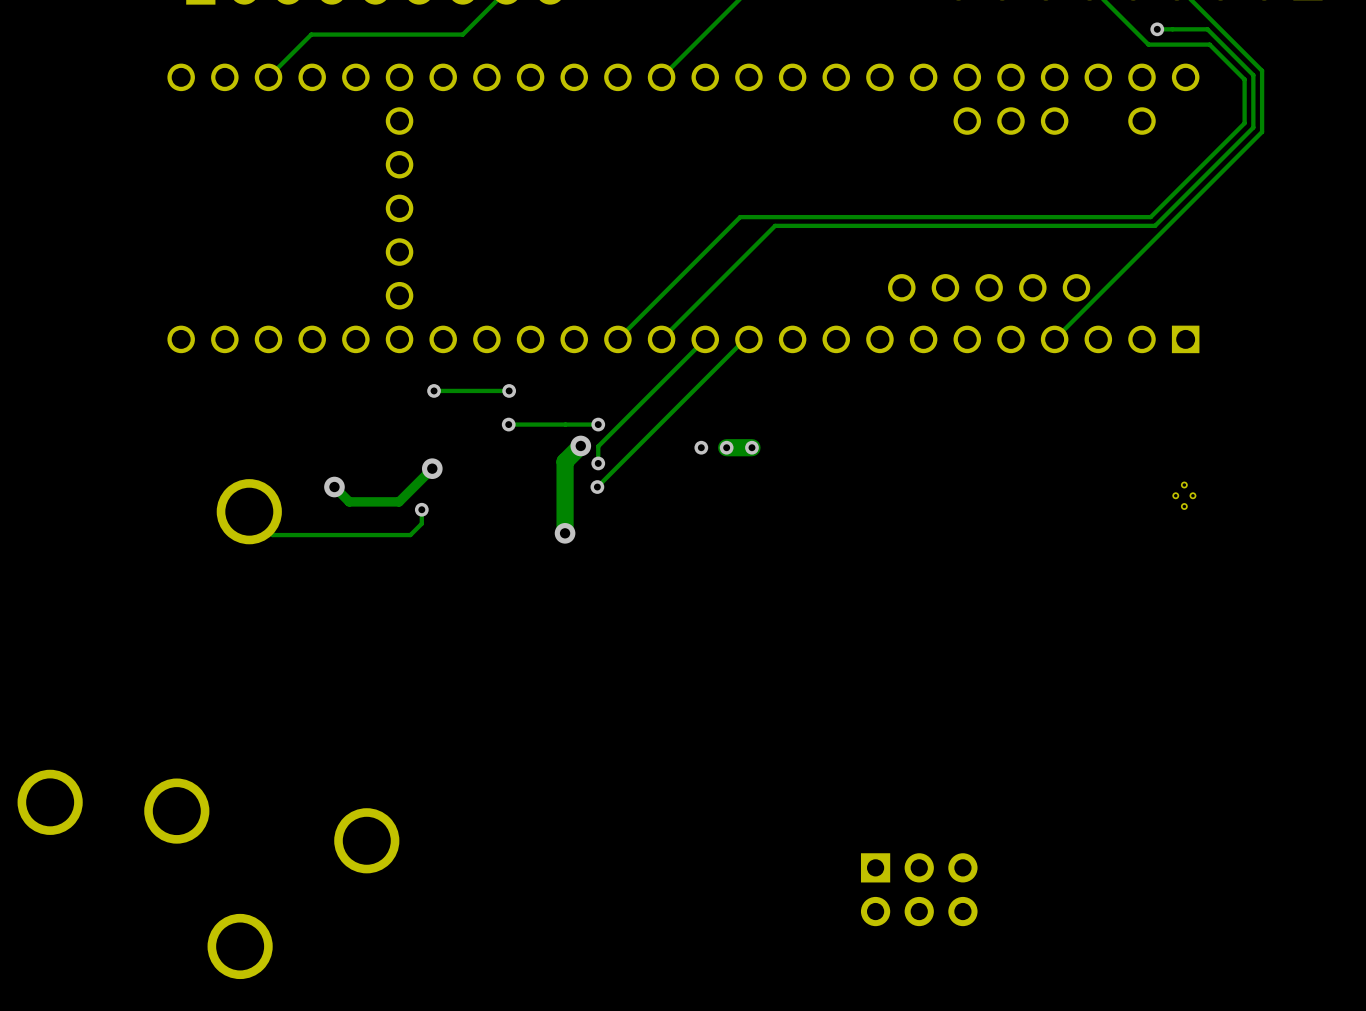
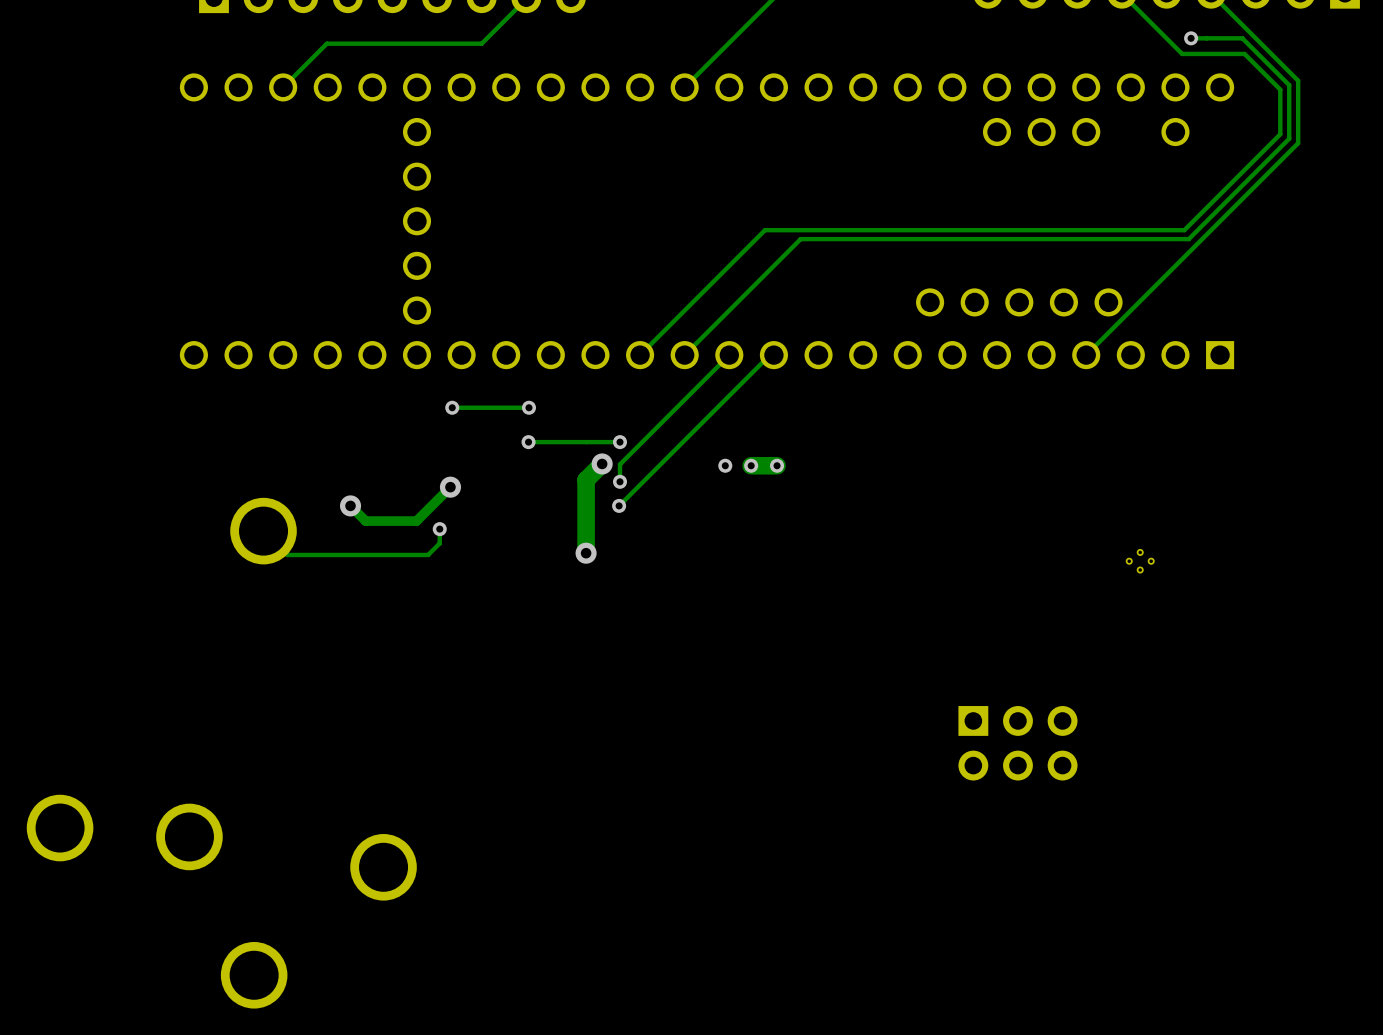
part rotation: 0° (1184, 495) -> 90° clockwise (1140, 561)
part position: (1184, 495) -> (1140, 561)
part position: (919, 889) -> (1017, 743)

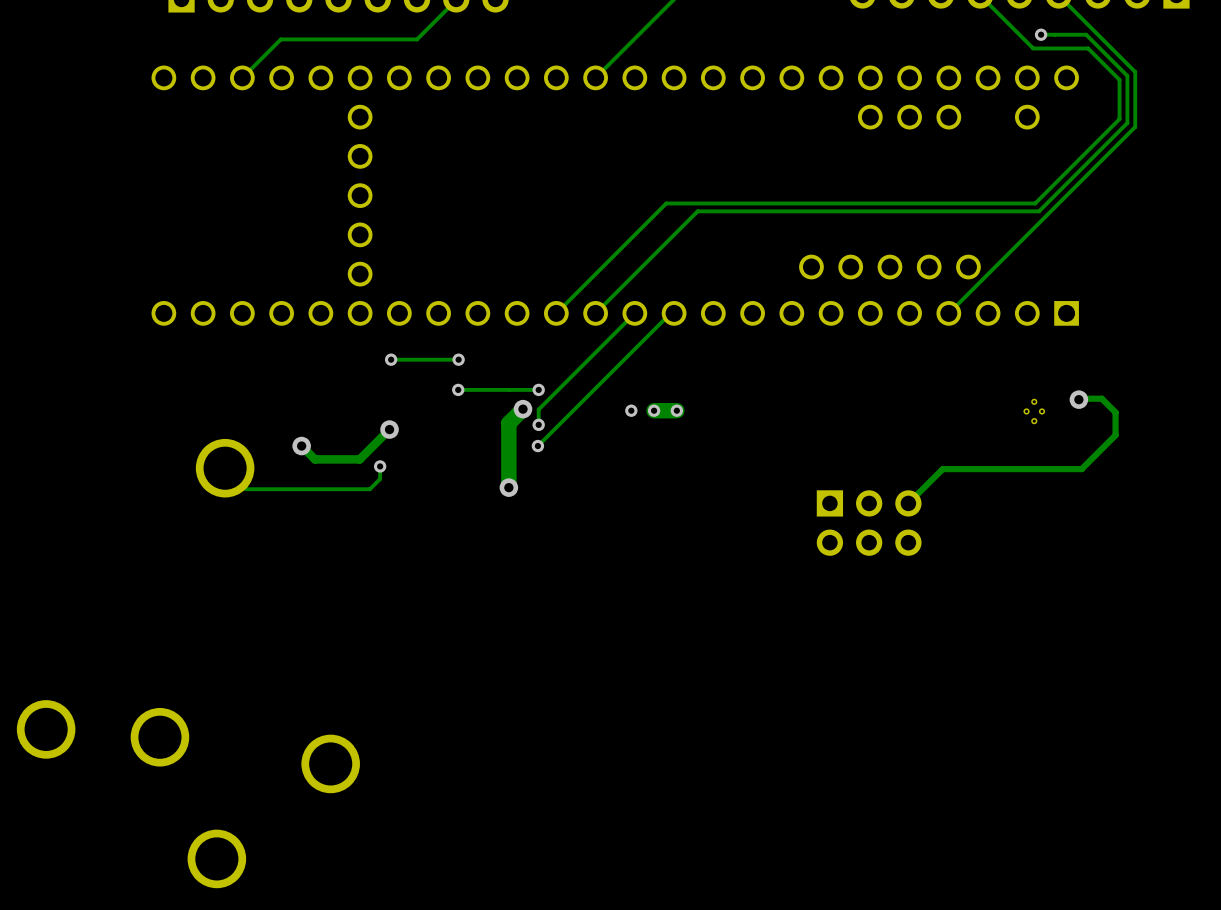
track: none -> (1078, 399) (1101, 398) (1115, 412) (1115, 435) (1081, 469) (942, 469) (908, 503)
via: none -> (1078, 399)
part rotation: 0° (1140, 561) -> 90° clockwise (1034, 411)
part position: (1140, 561) -> (1034, 411)
part position: (1017, 743) -> (869, 523)

